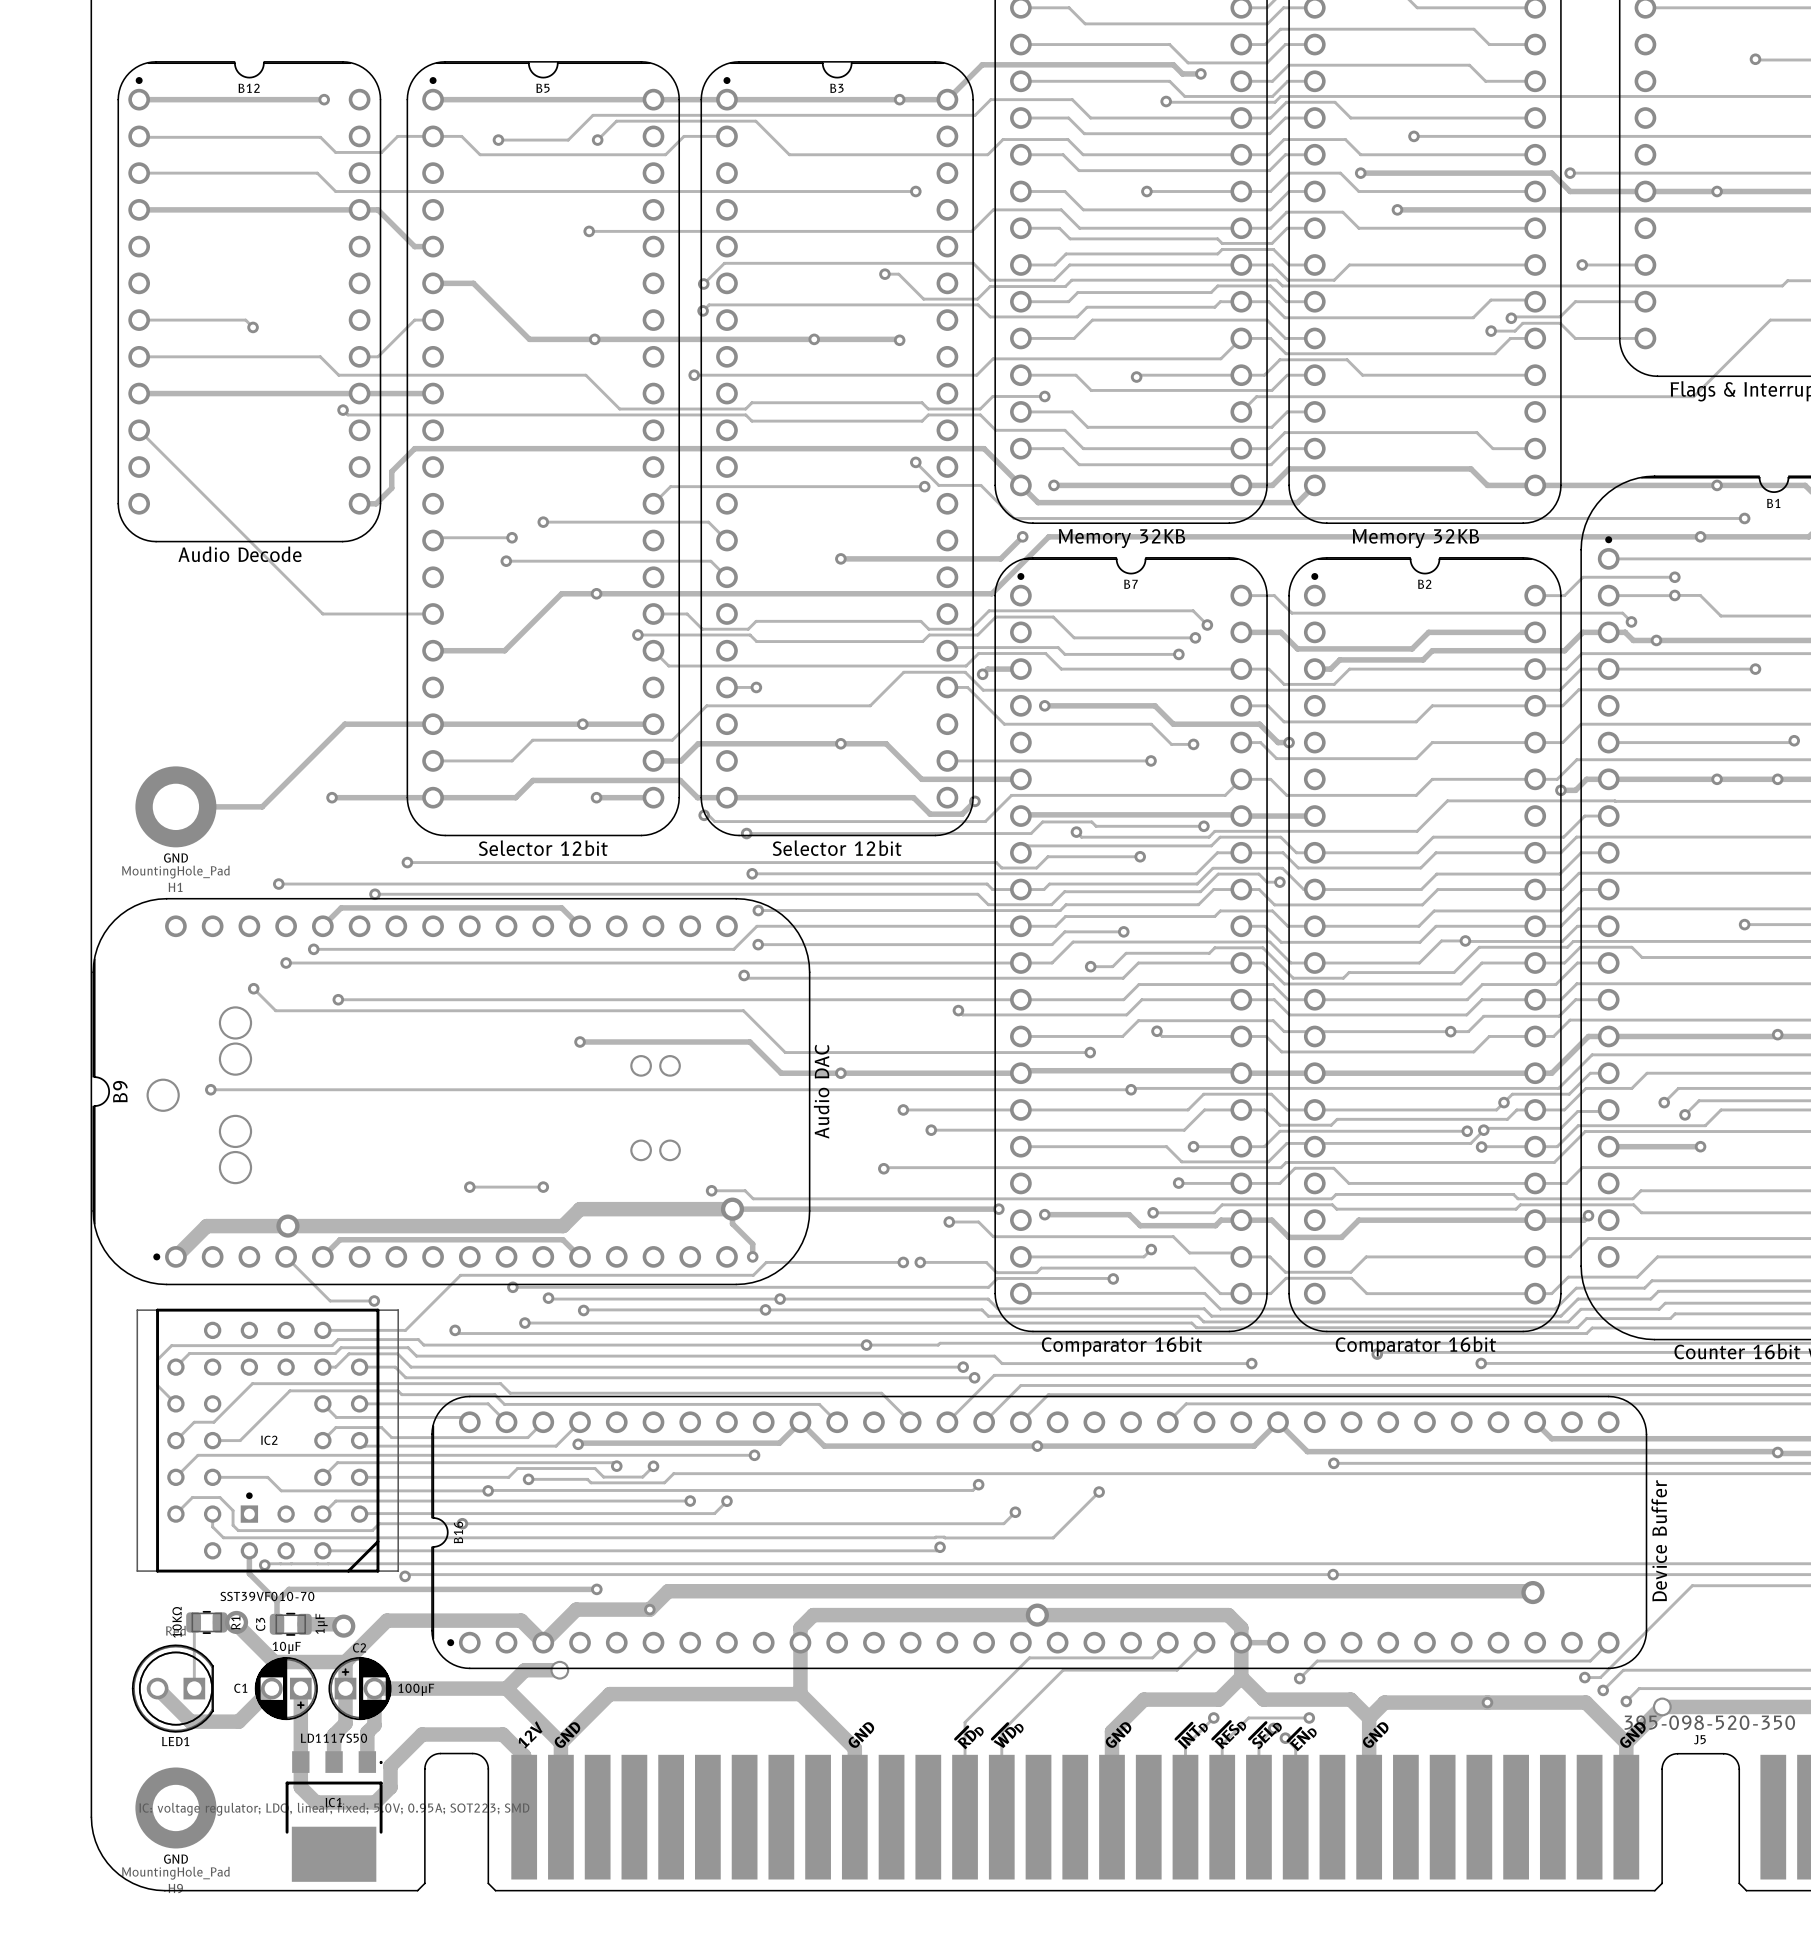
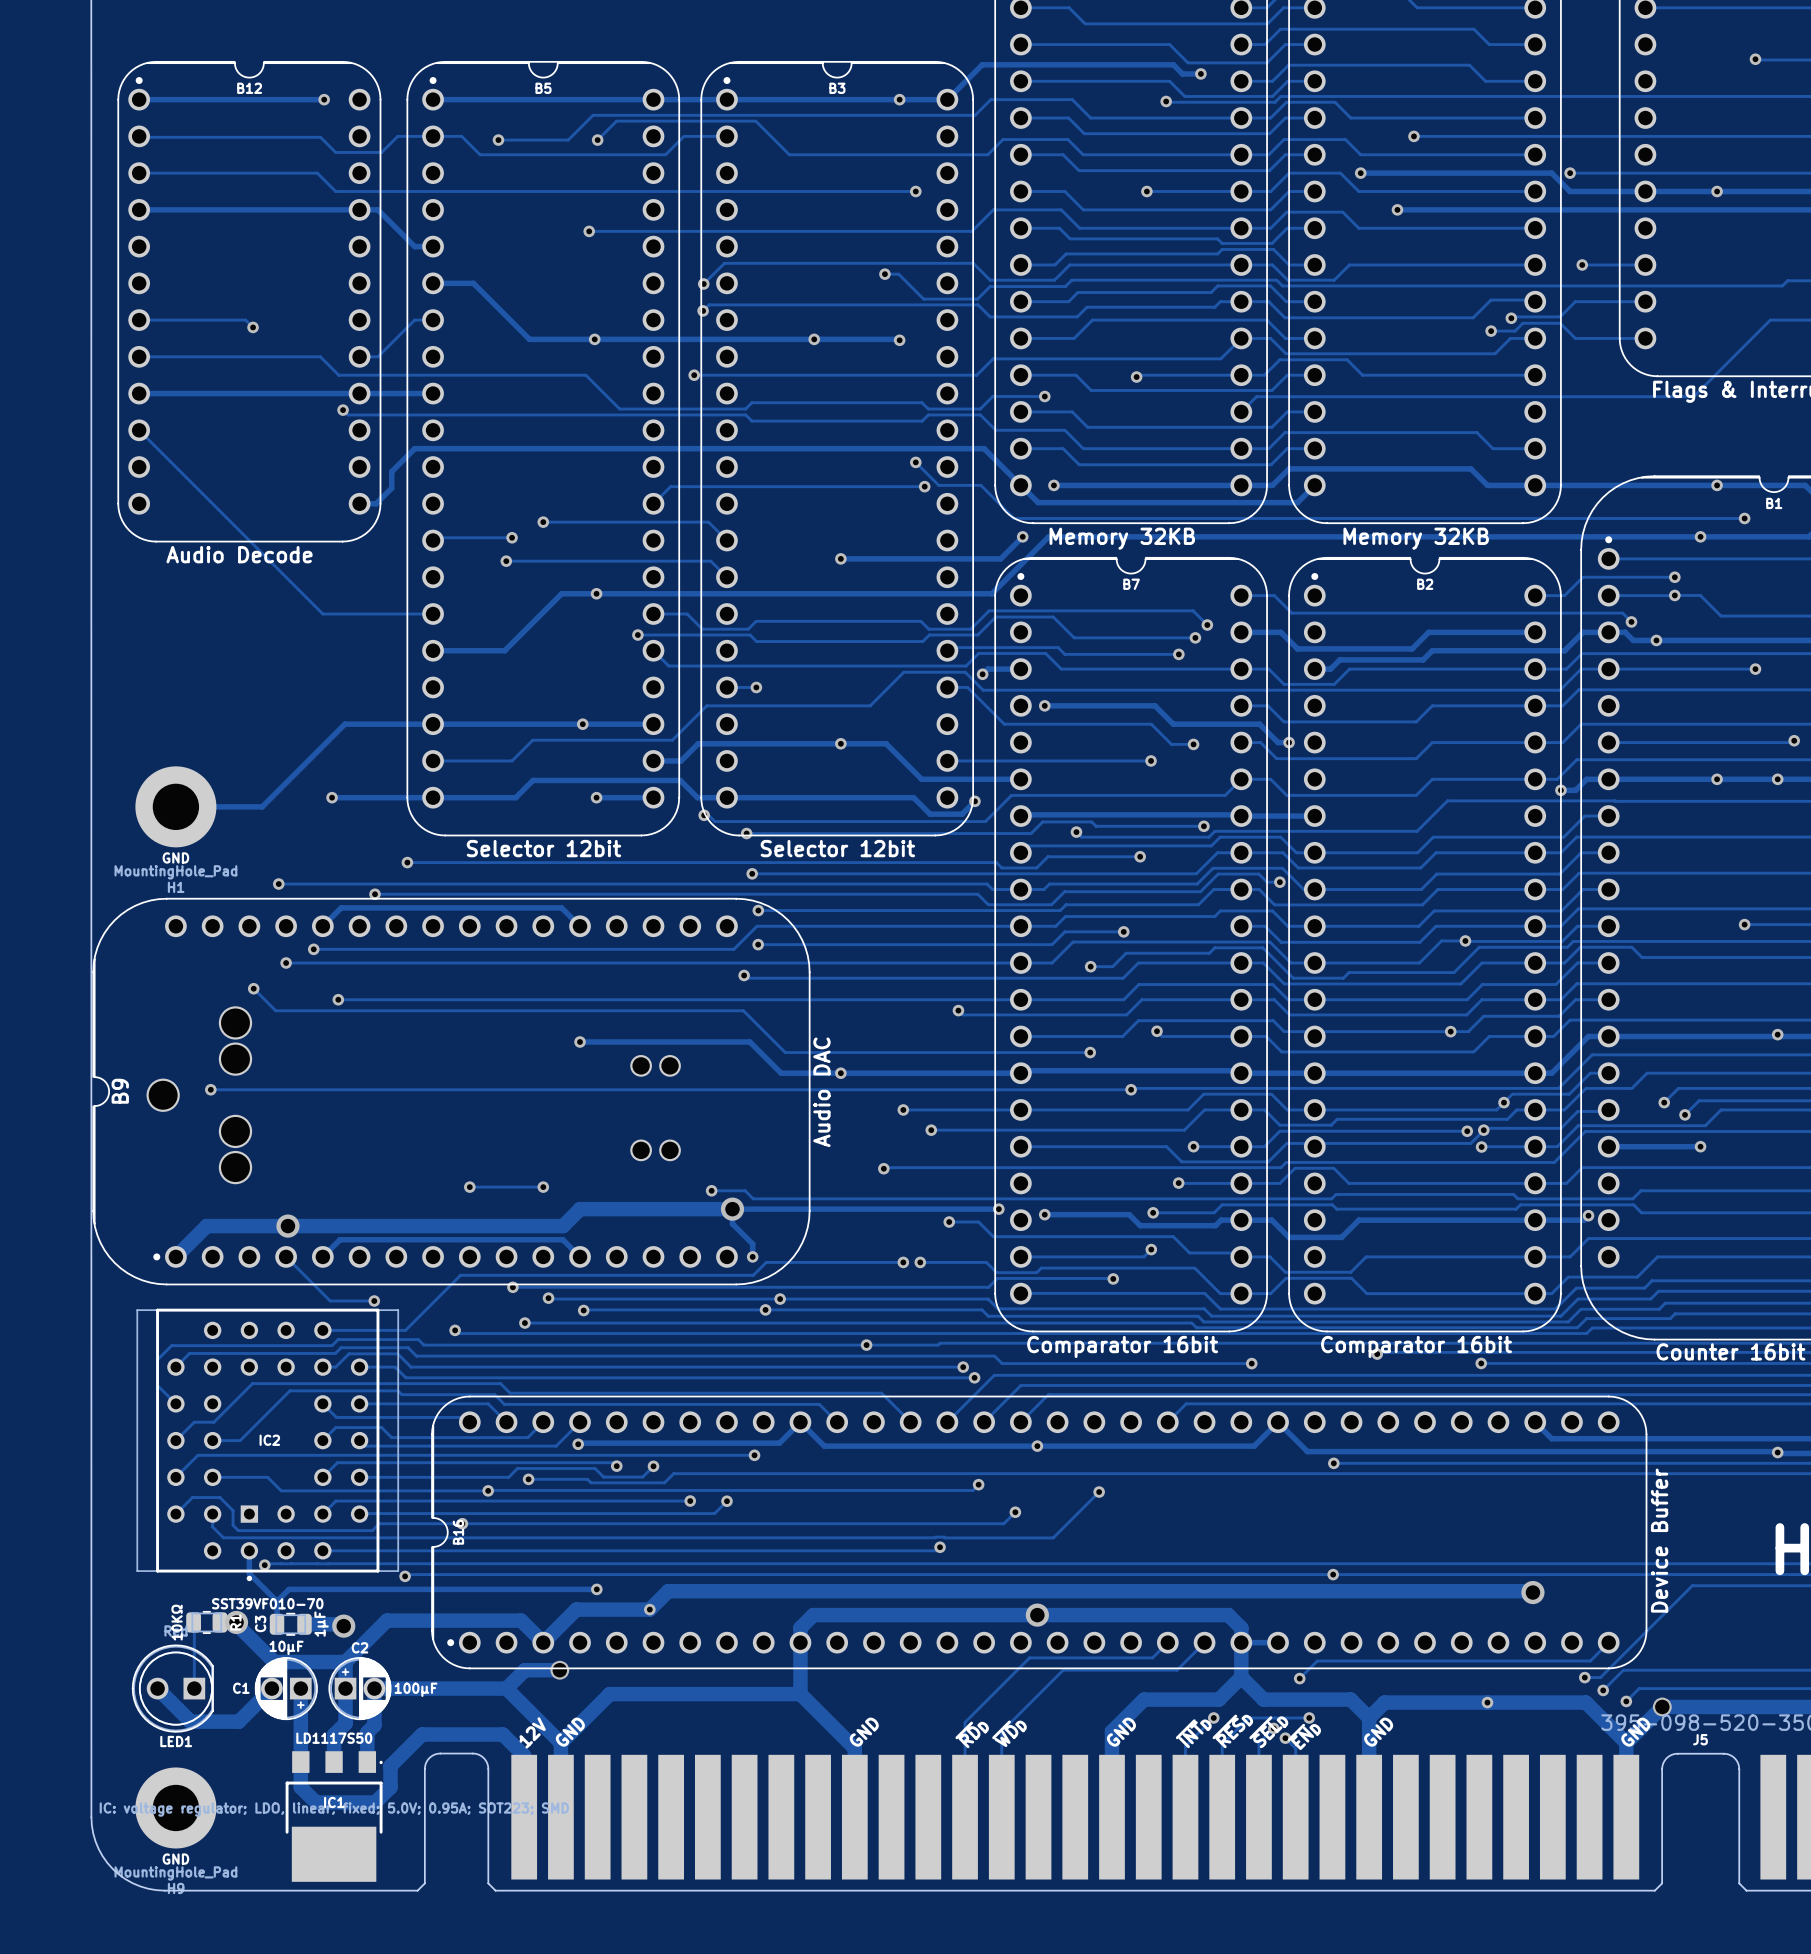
IC2 footprint: [136, 1308, 399, 1573] -> [136, 1308, 399, 1582]

